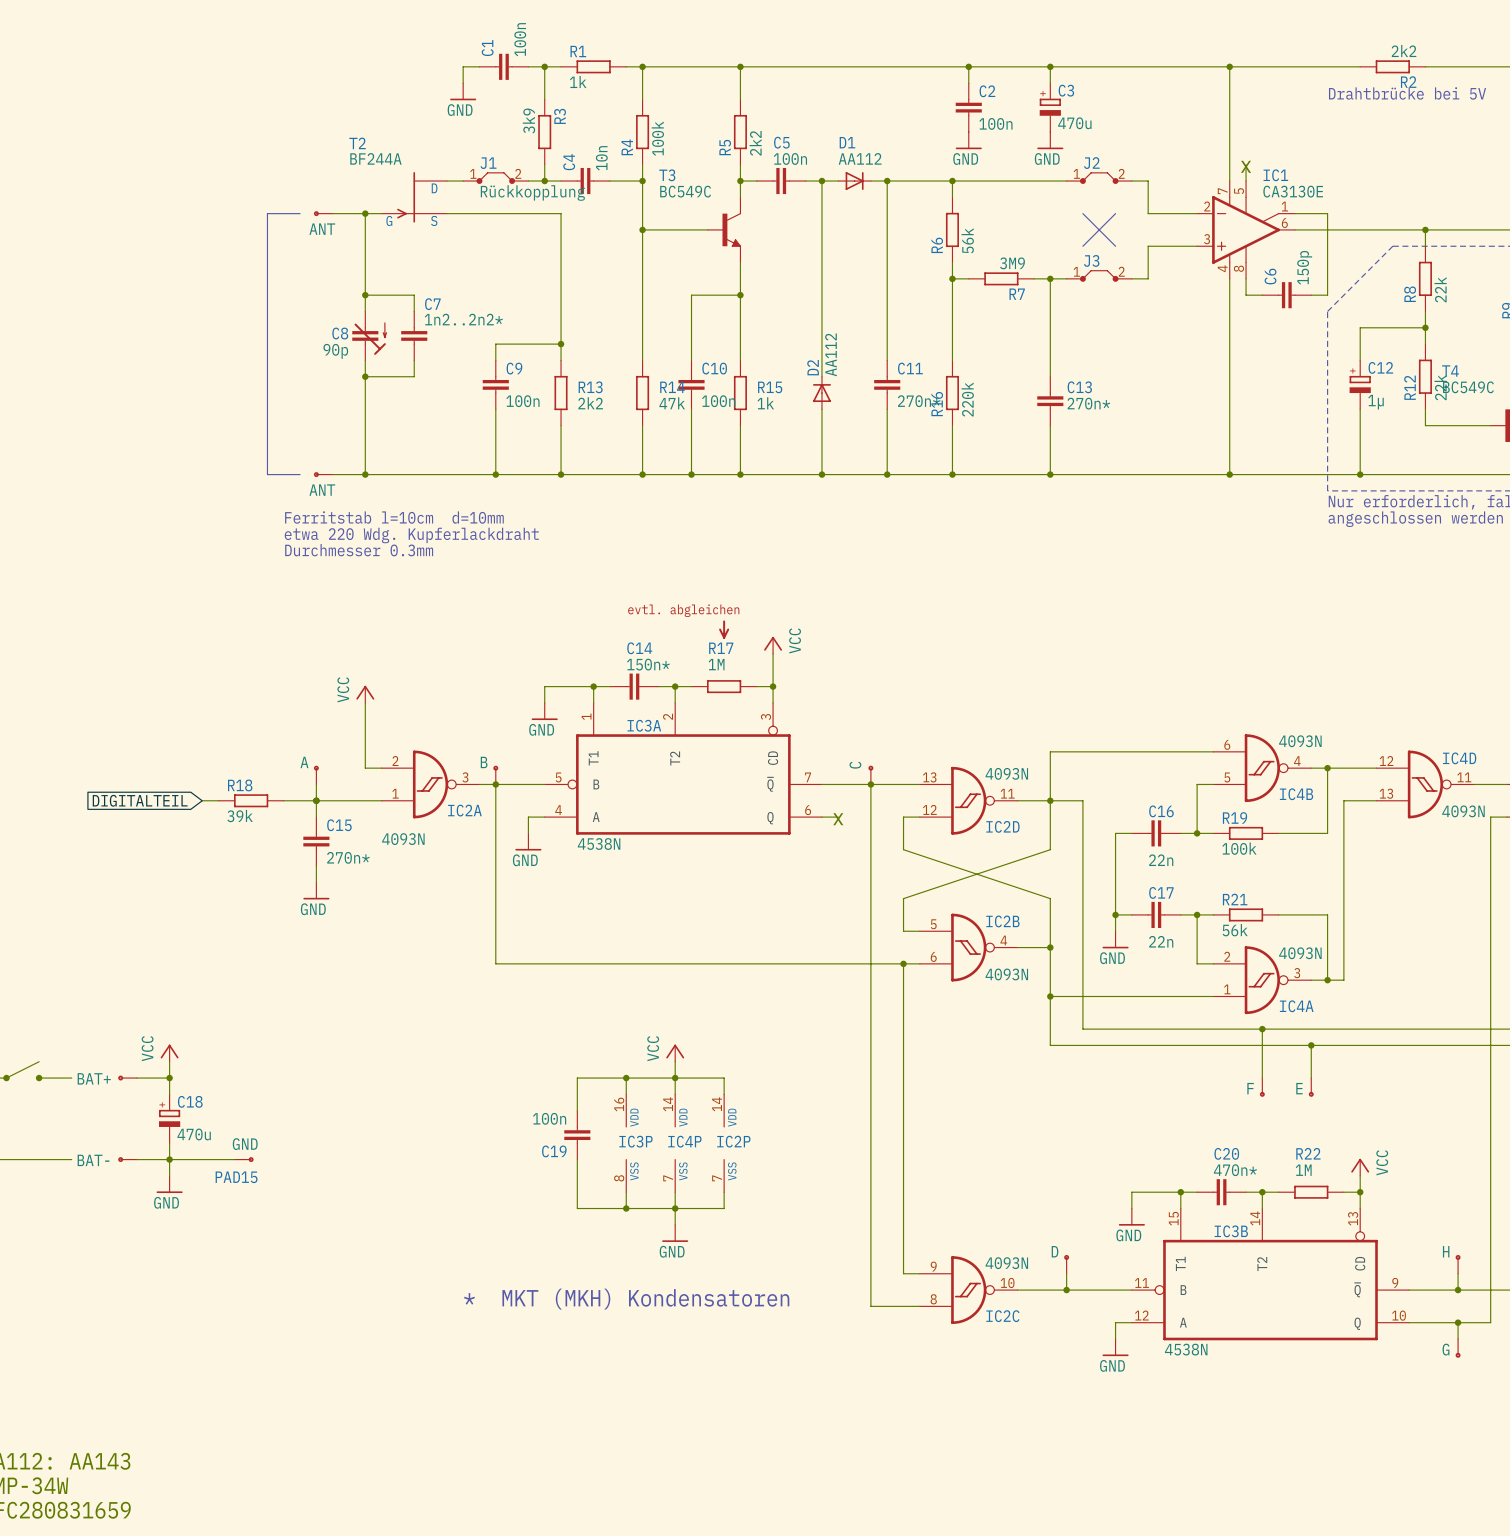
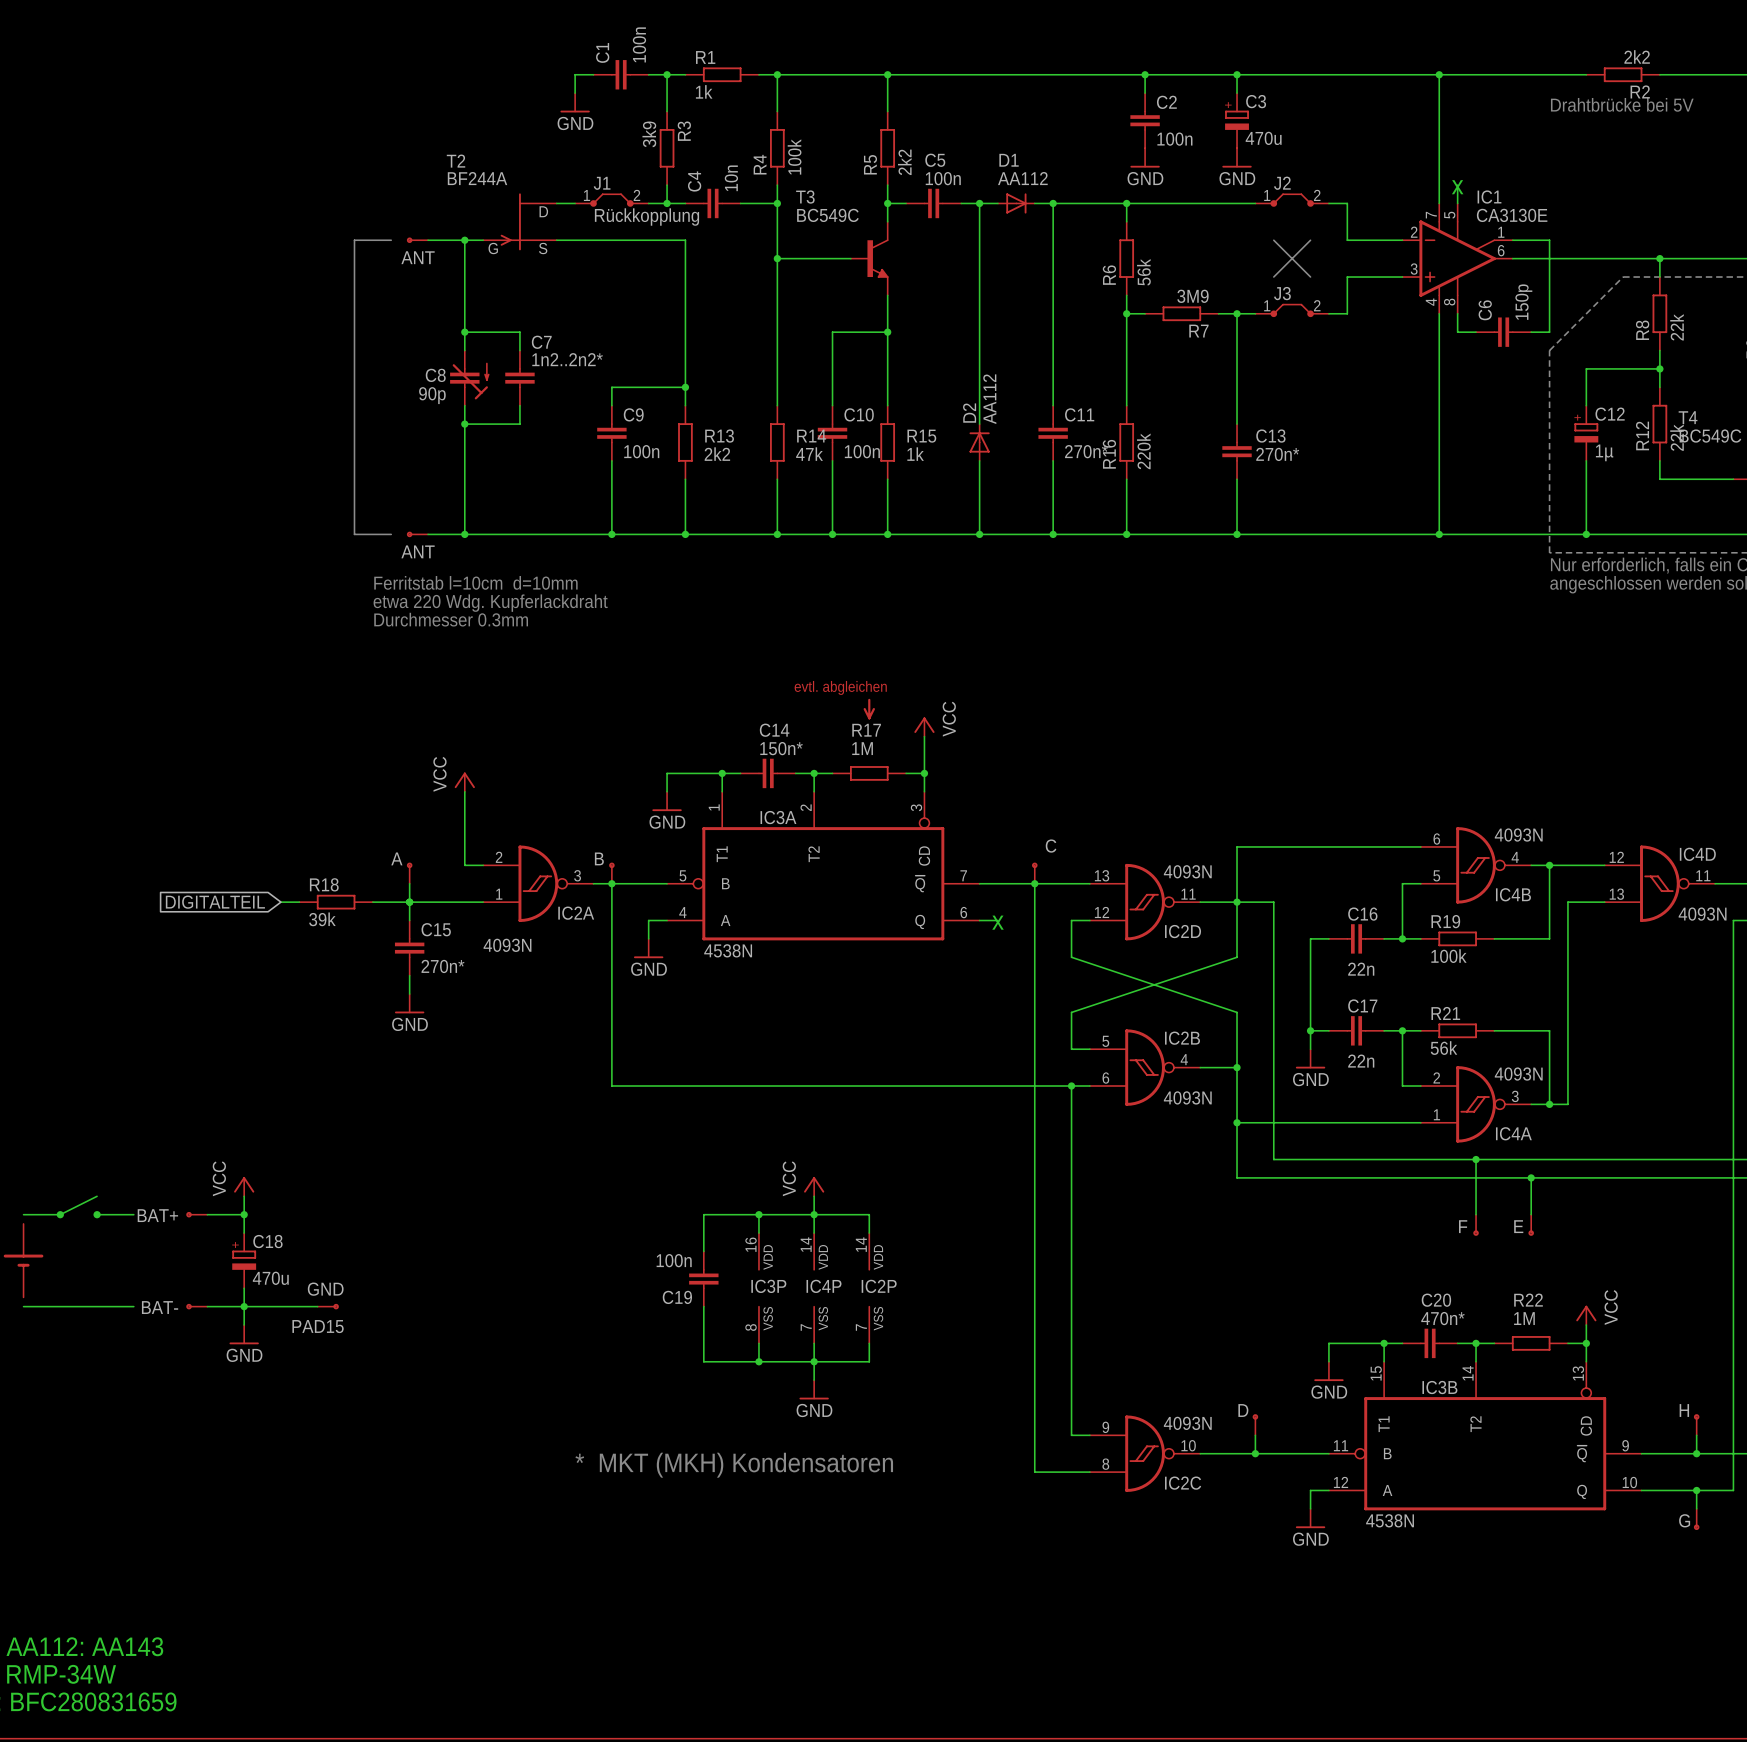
part value rotation: 0° (855, 765) -> 90° clockwise (1051, 846)
part value position: C (855, 765) -> C (1051, 846)

